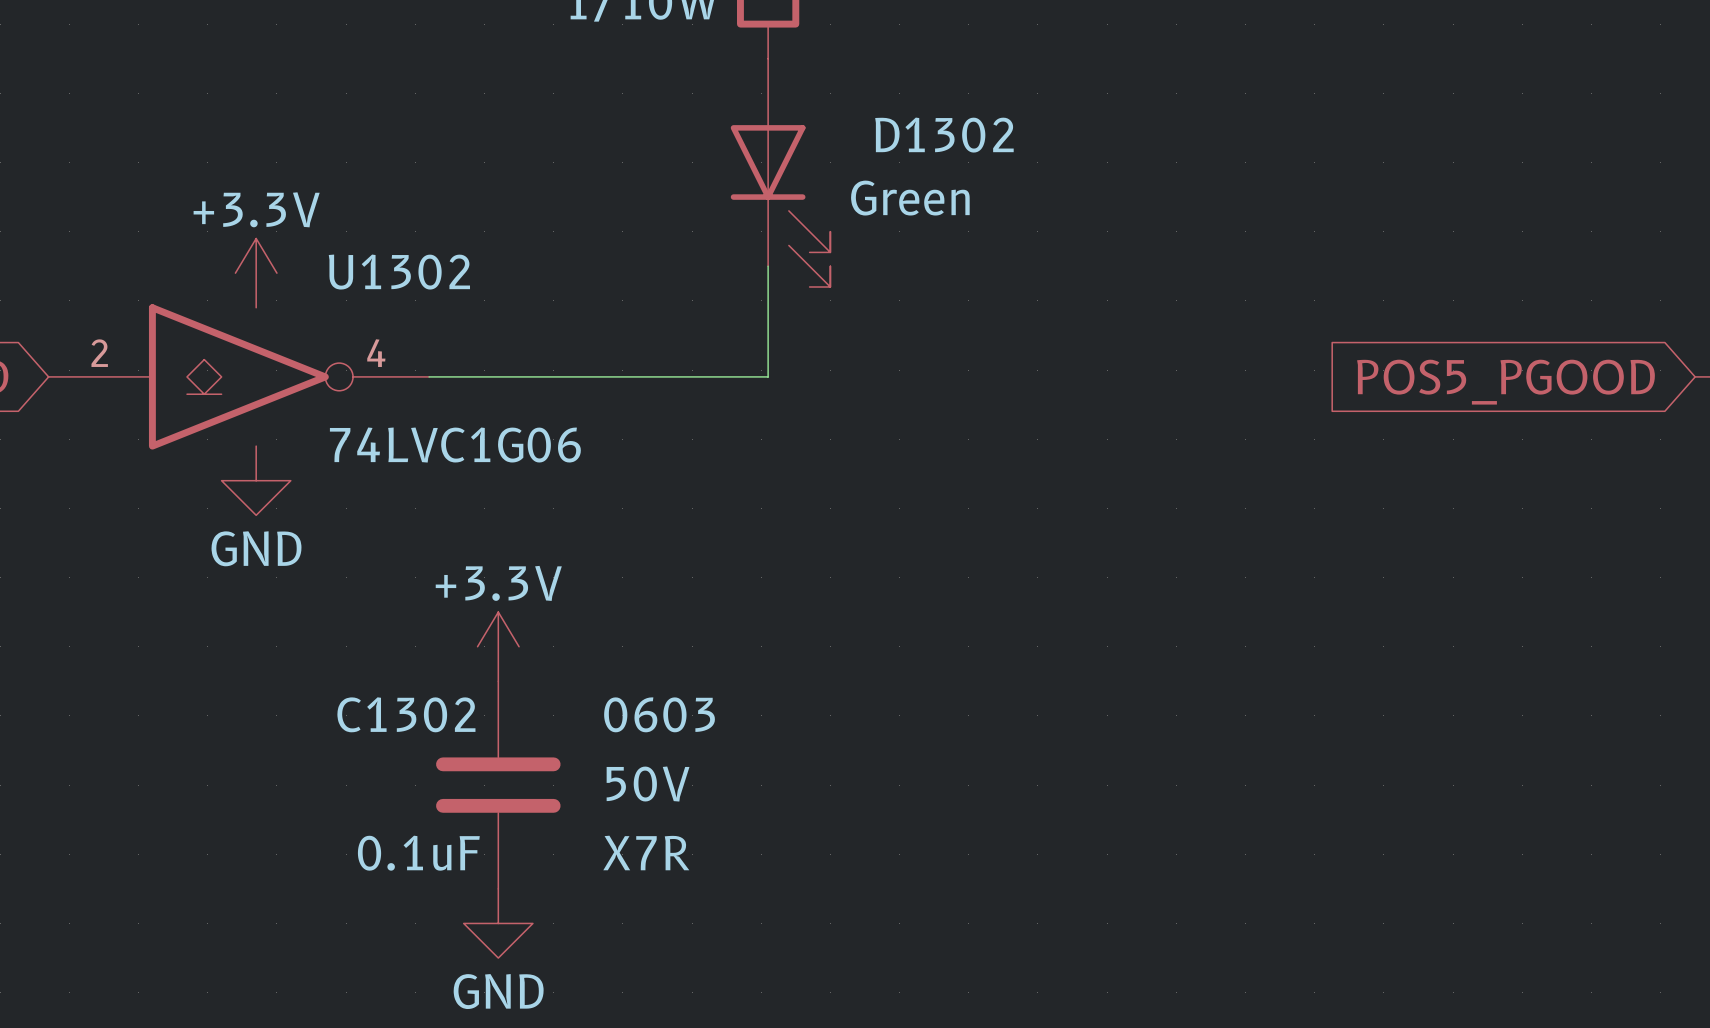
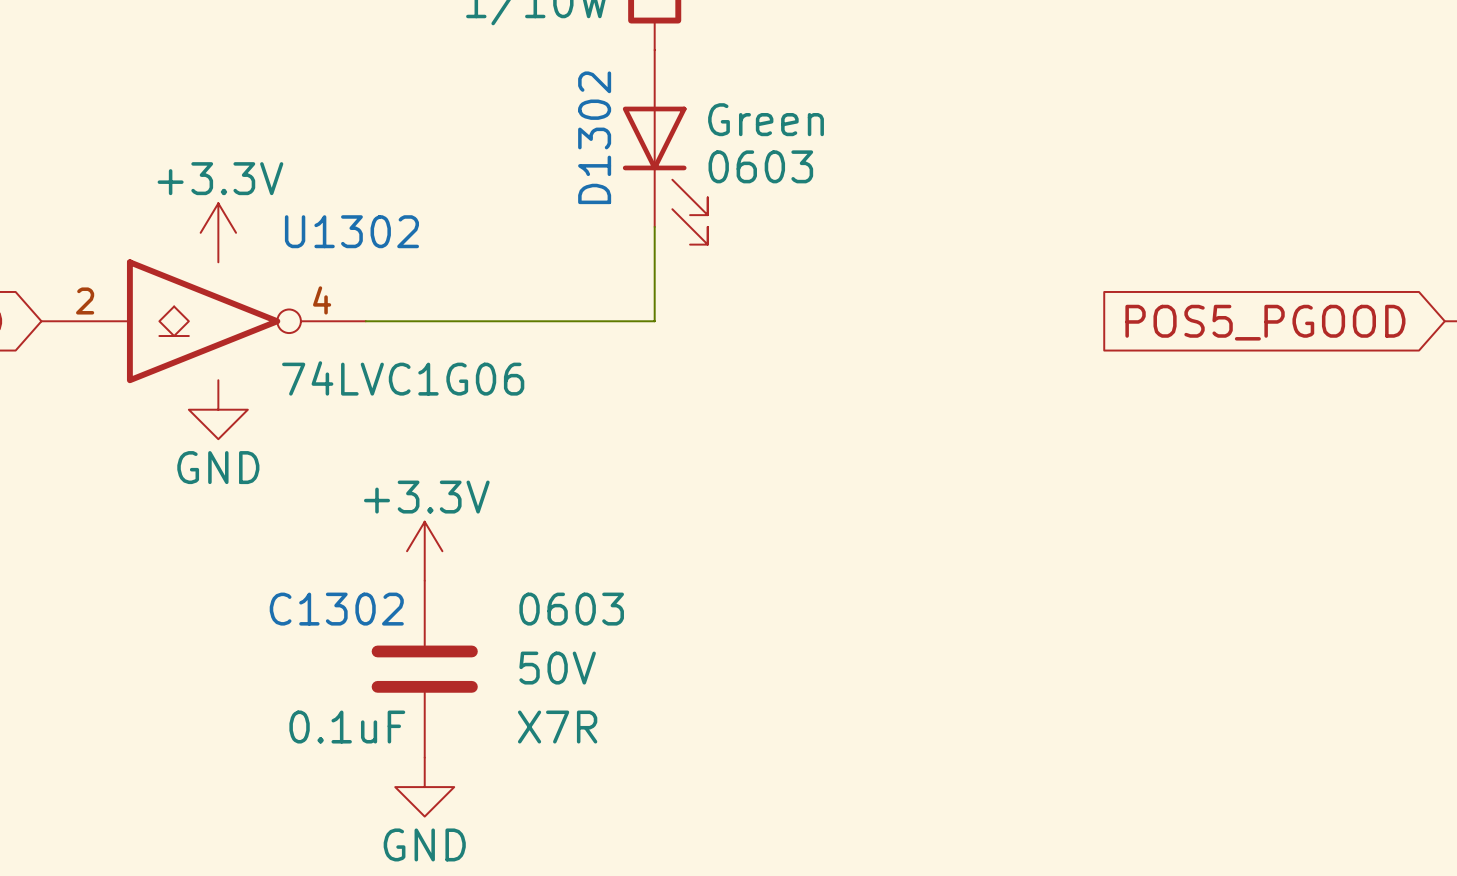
D1302 name rotation: 0° (944, 135) -> 90° counterclockwise (594, 137)
D1302 name position: D1302 (944, 135) -> D1302 (594, 137)
D1302 text: none -> 0603 (760, 166)
D1302 value position: Green (910, 198) -> Green (766, 119)

